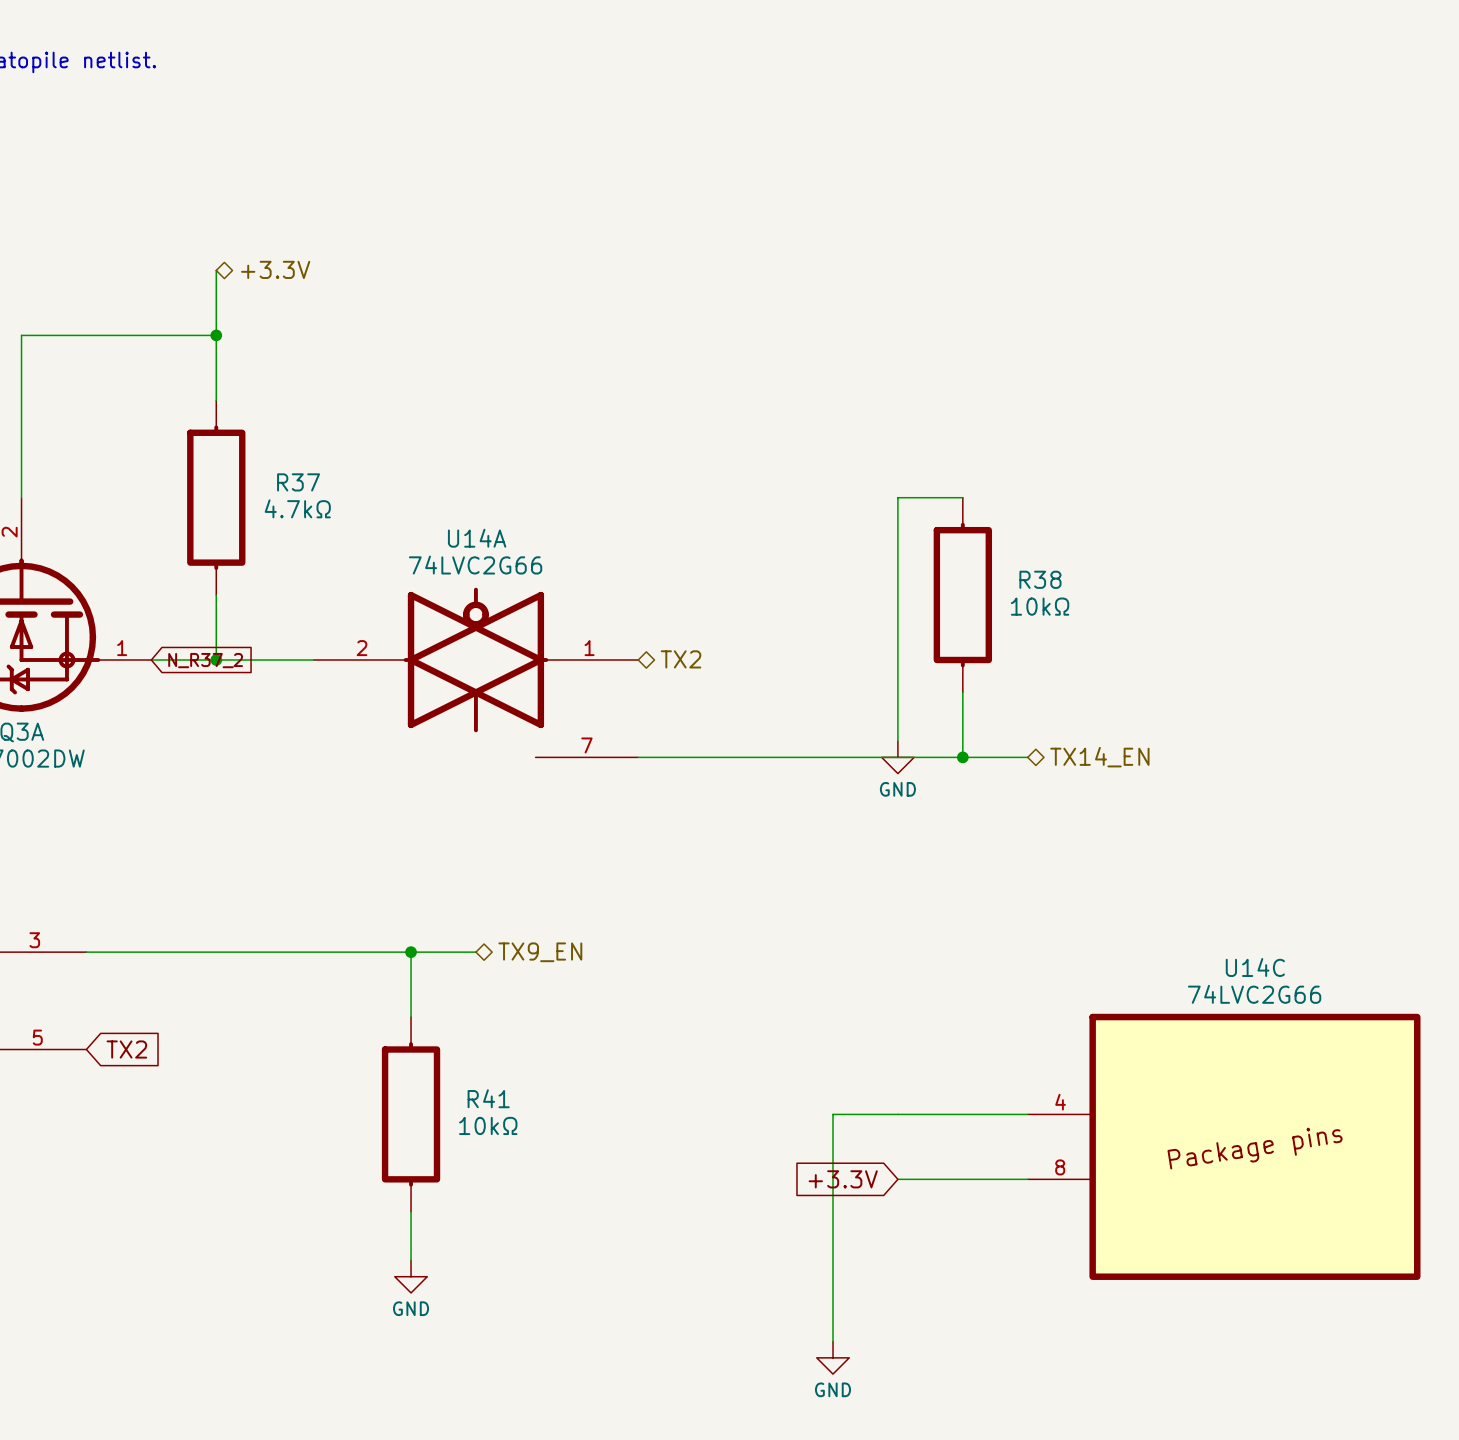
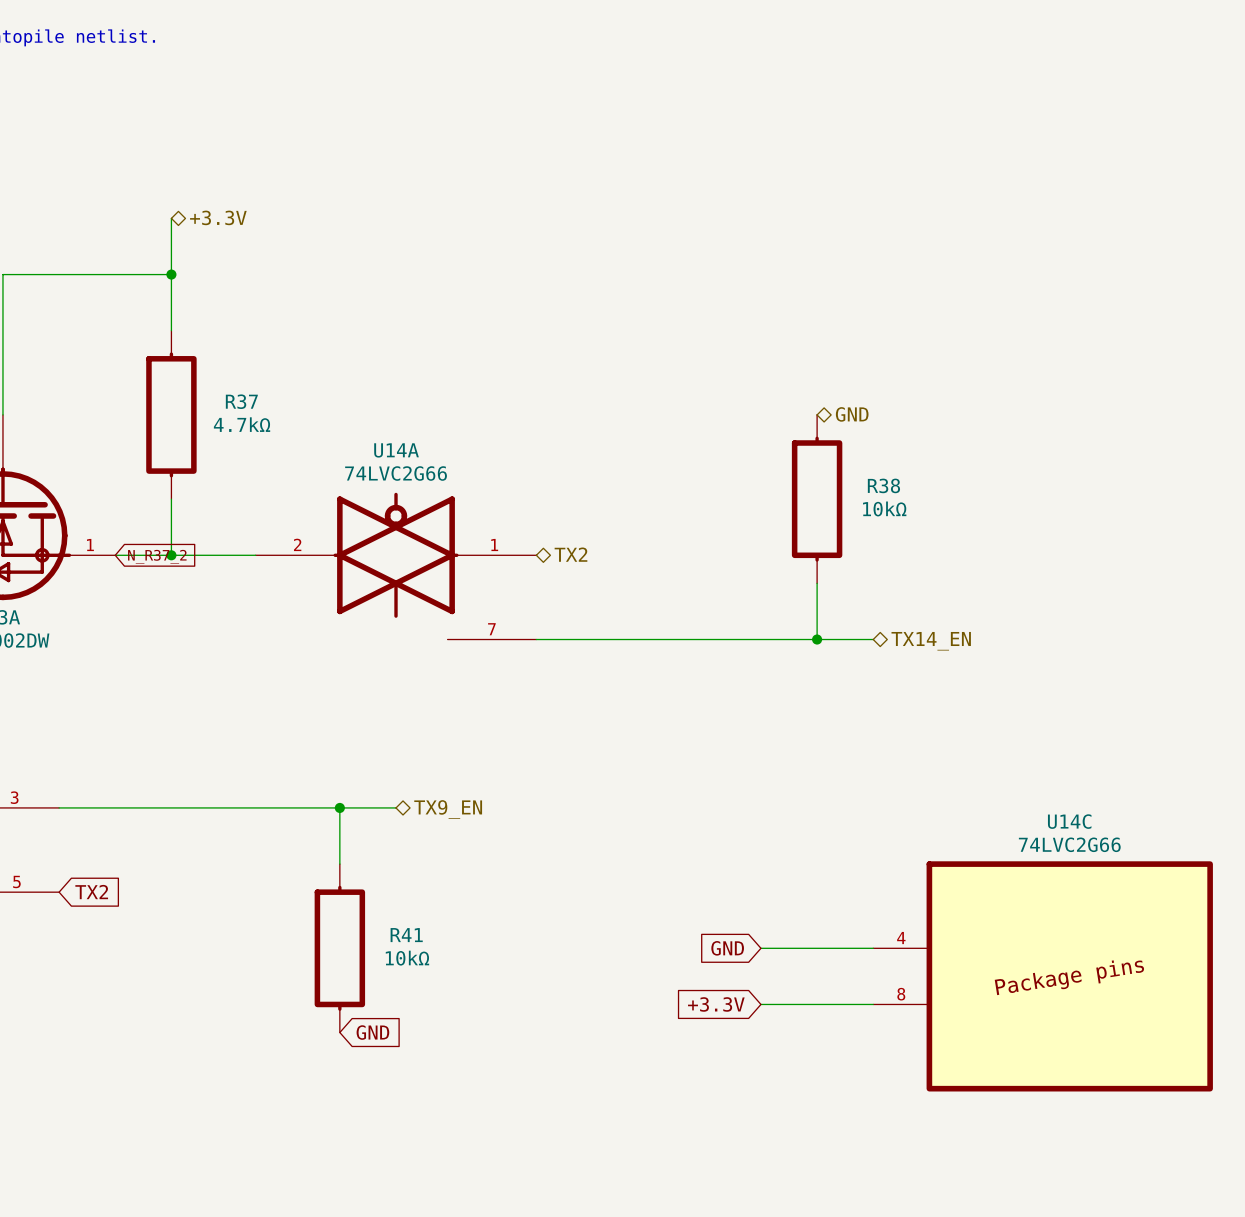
wire: (962, 497) (897, 497) (897, 741) -> none
hierarchical label: none -> GND (852, 414)
power symbol: GND (897, 757) -> none
global label: none -> GND (727, 948)
wire: (897, 1114) (832, 1114) (832, 1341) -> none
wire: (411, 1211) (411, 1260) -> none
global label: none -> GND (372, 1032)
power symbol: GND (411, 1276) -> none
power symbol: GND (832, 1357) -> none

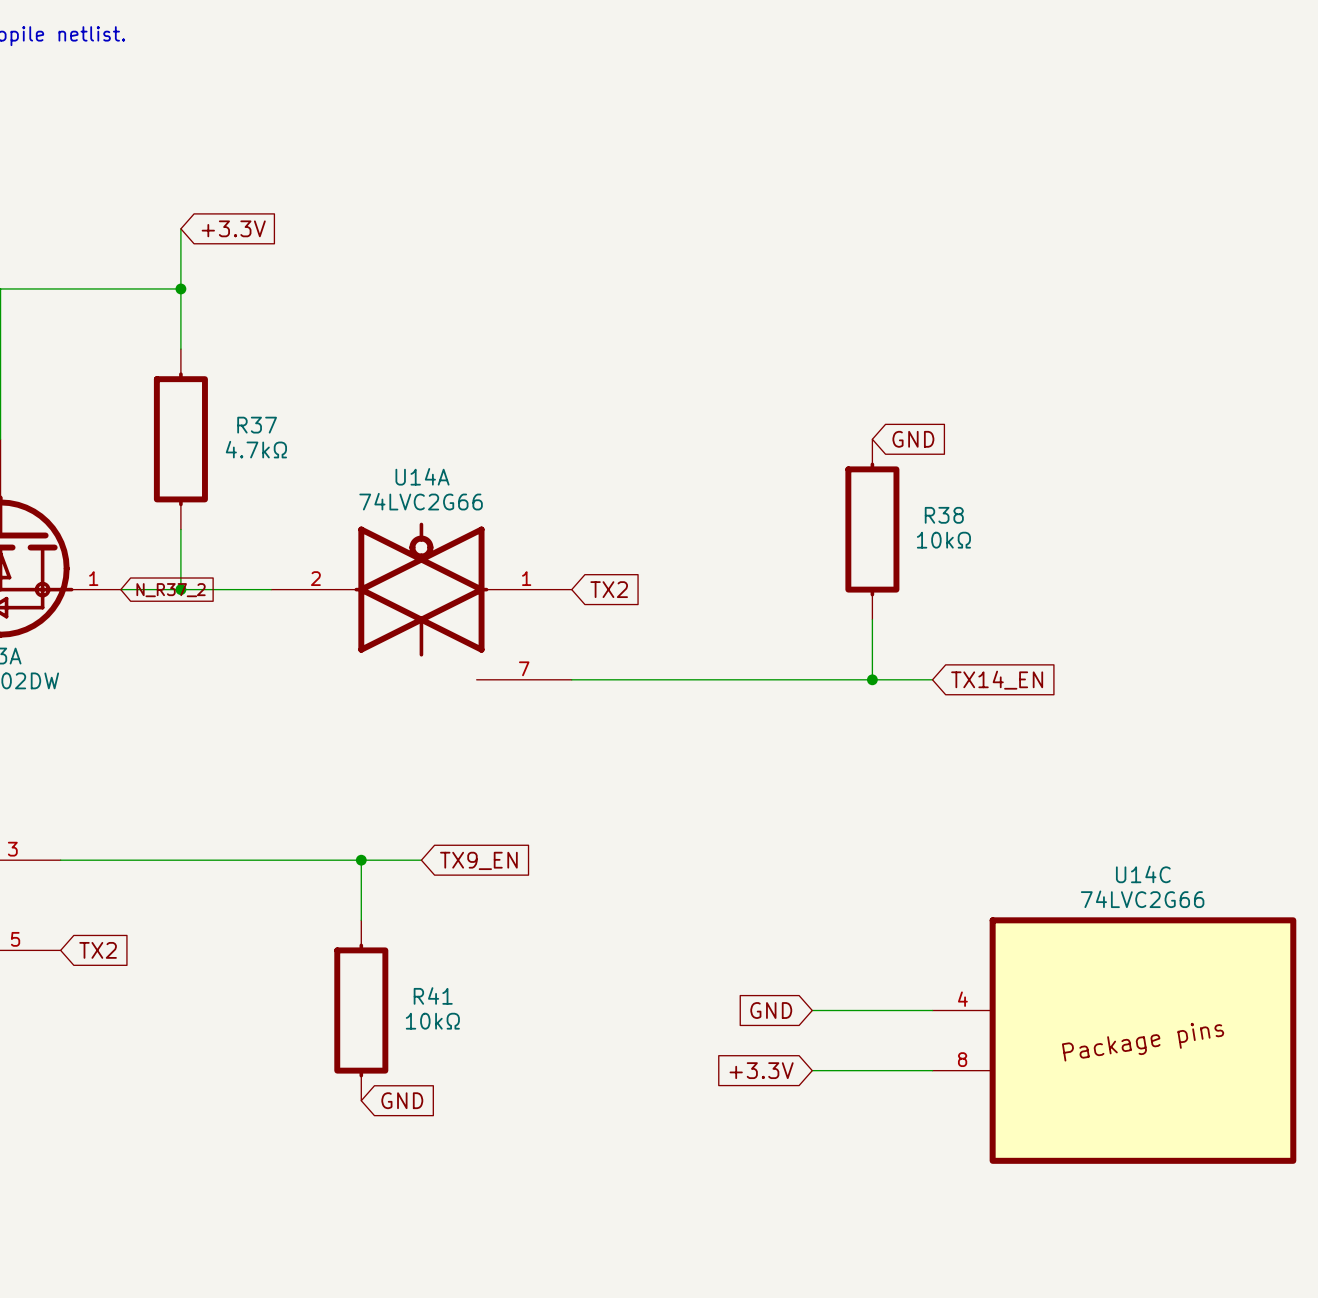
hierarchical label: +3.3V (218, 217) -> none
global label: none -> +3.3V (233, 228)
global label: none -> GND (913, 439)
hierarchical label: GND (852, 414) -> none
hierarchical label: TX2 (570, 554) -> none
global label: none -> TX2 (609, 589)
global label: none -> TX14_EN (997, 680)
hierarchical label: TX14_EN (931, 641) -> none
hierarchical label: TX9_EN (448, 809) -> none
global label: none -> TX9_EN (478, 860)

